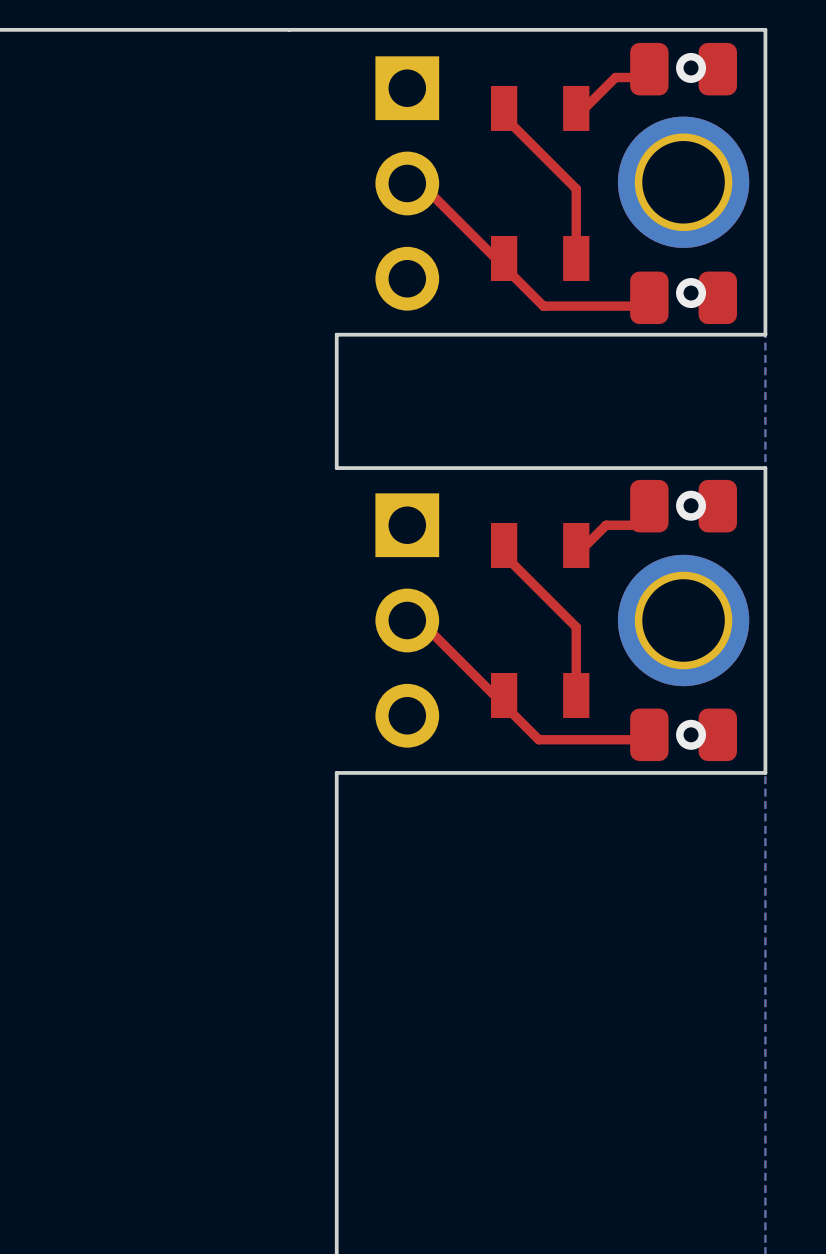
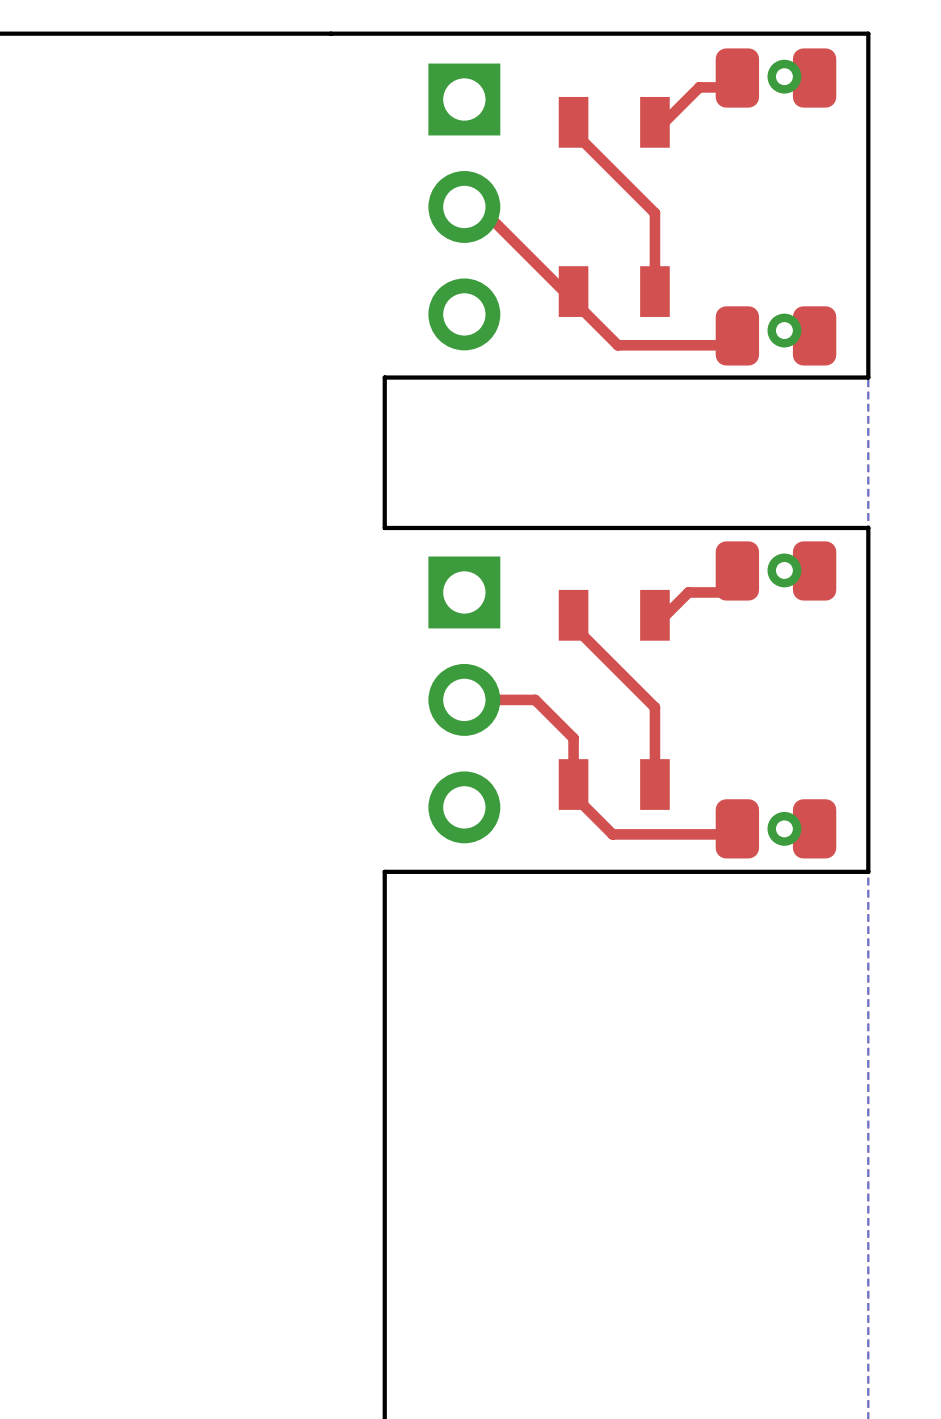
part: (683, 182) -> none
part: (683, 620) -> none
top track: (407, 630) (429, 630) (504, 705) -> (464, 699) (535, 699) (573, 738) (573, 795)

